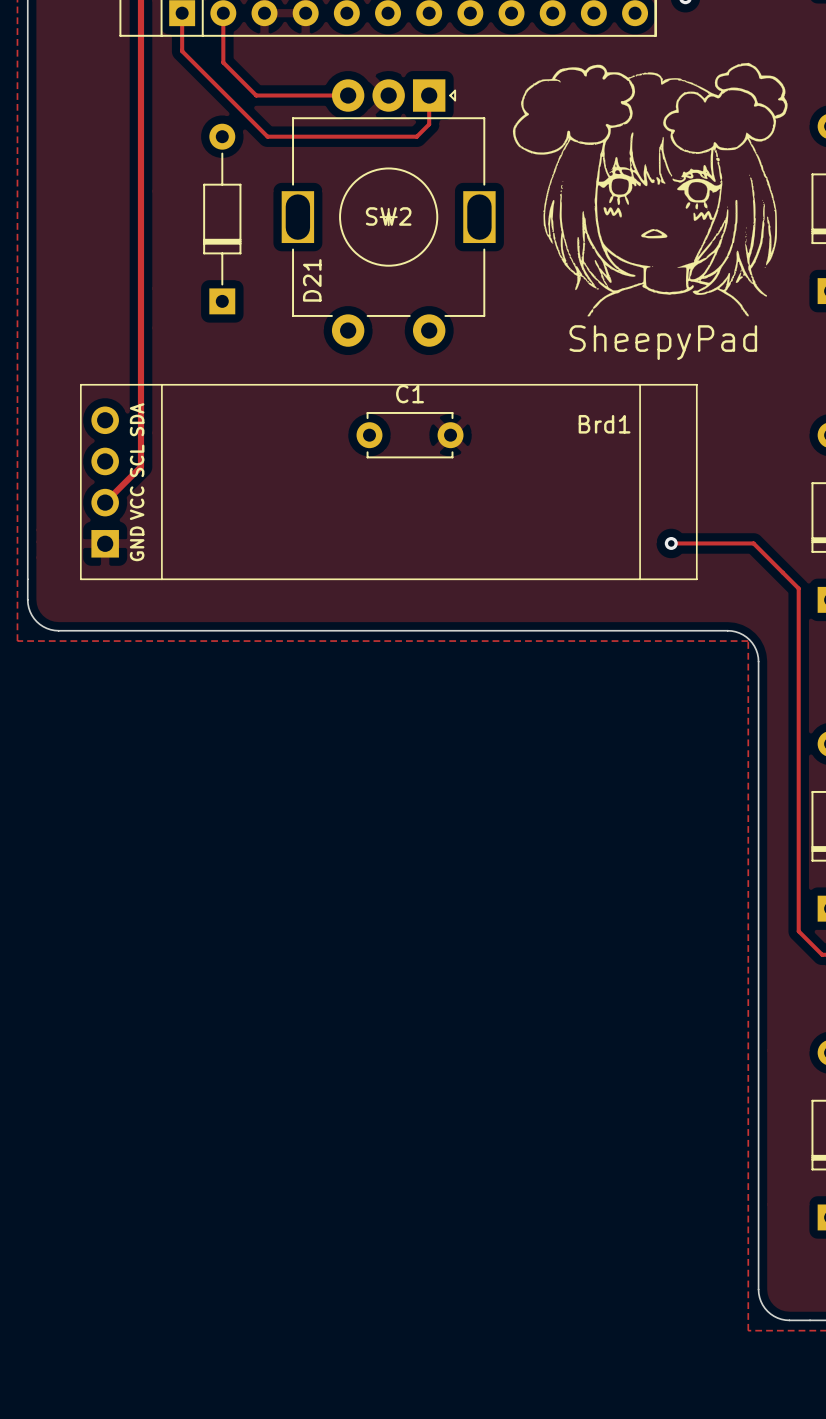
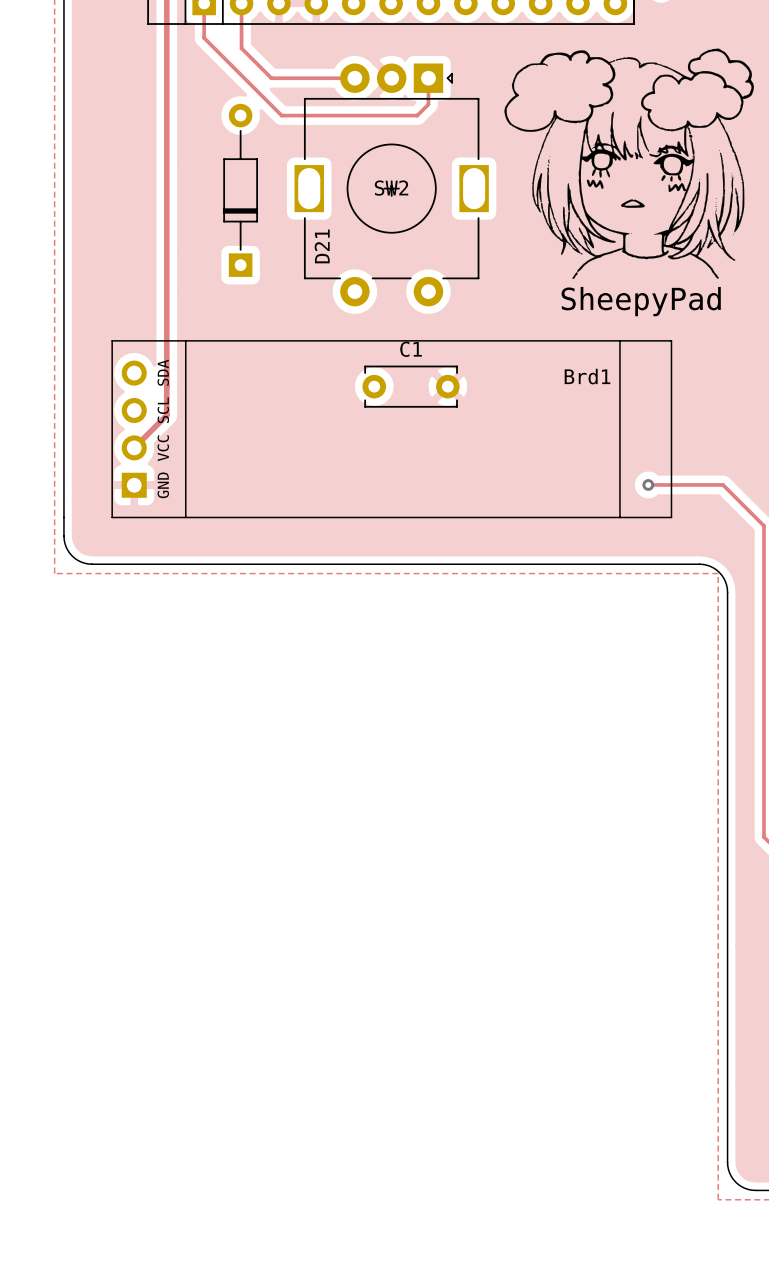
C1 footprint: [356, 412, 464, 459] -> [362, 365, 460, 408]

